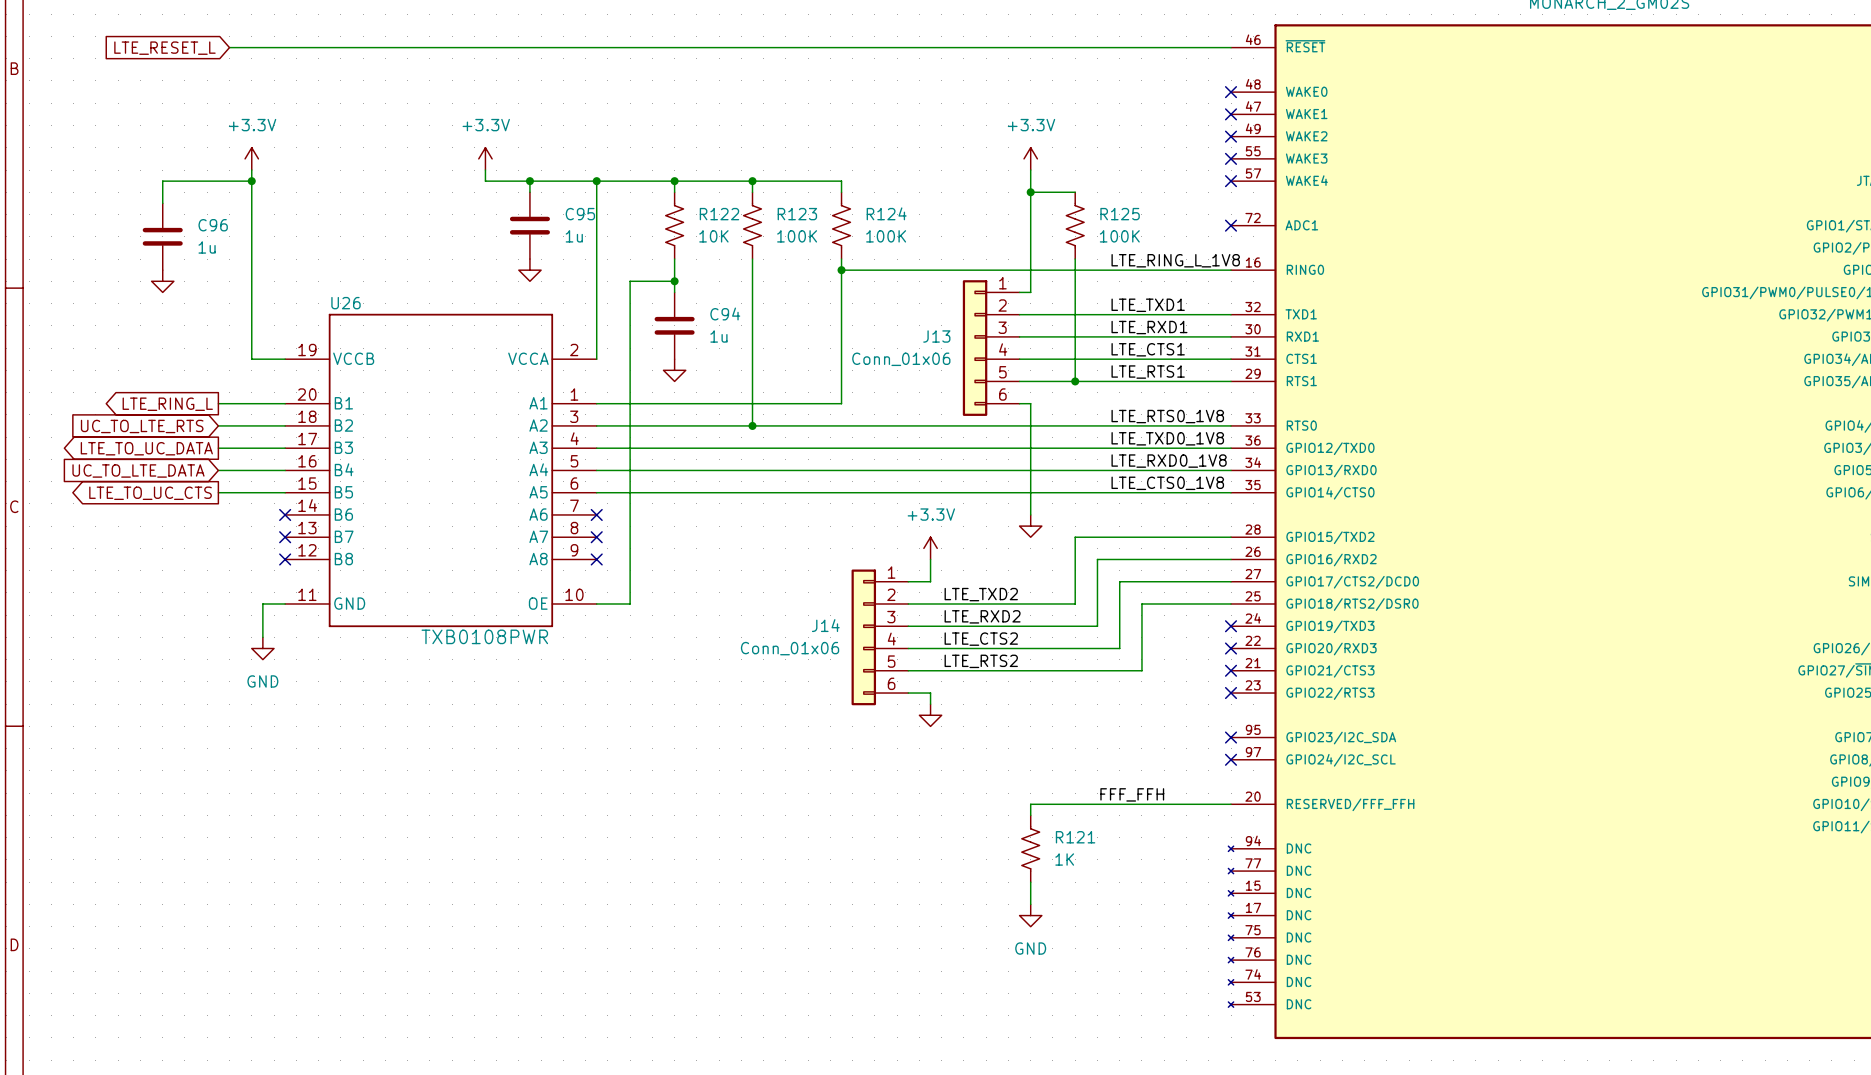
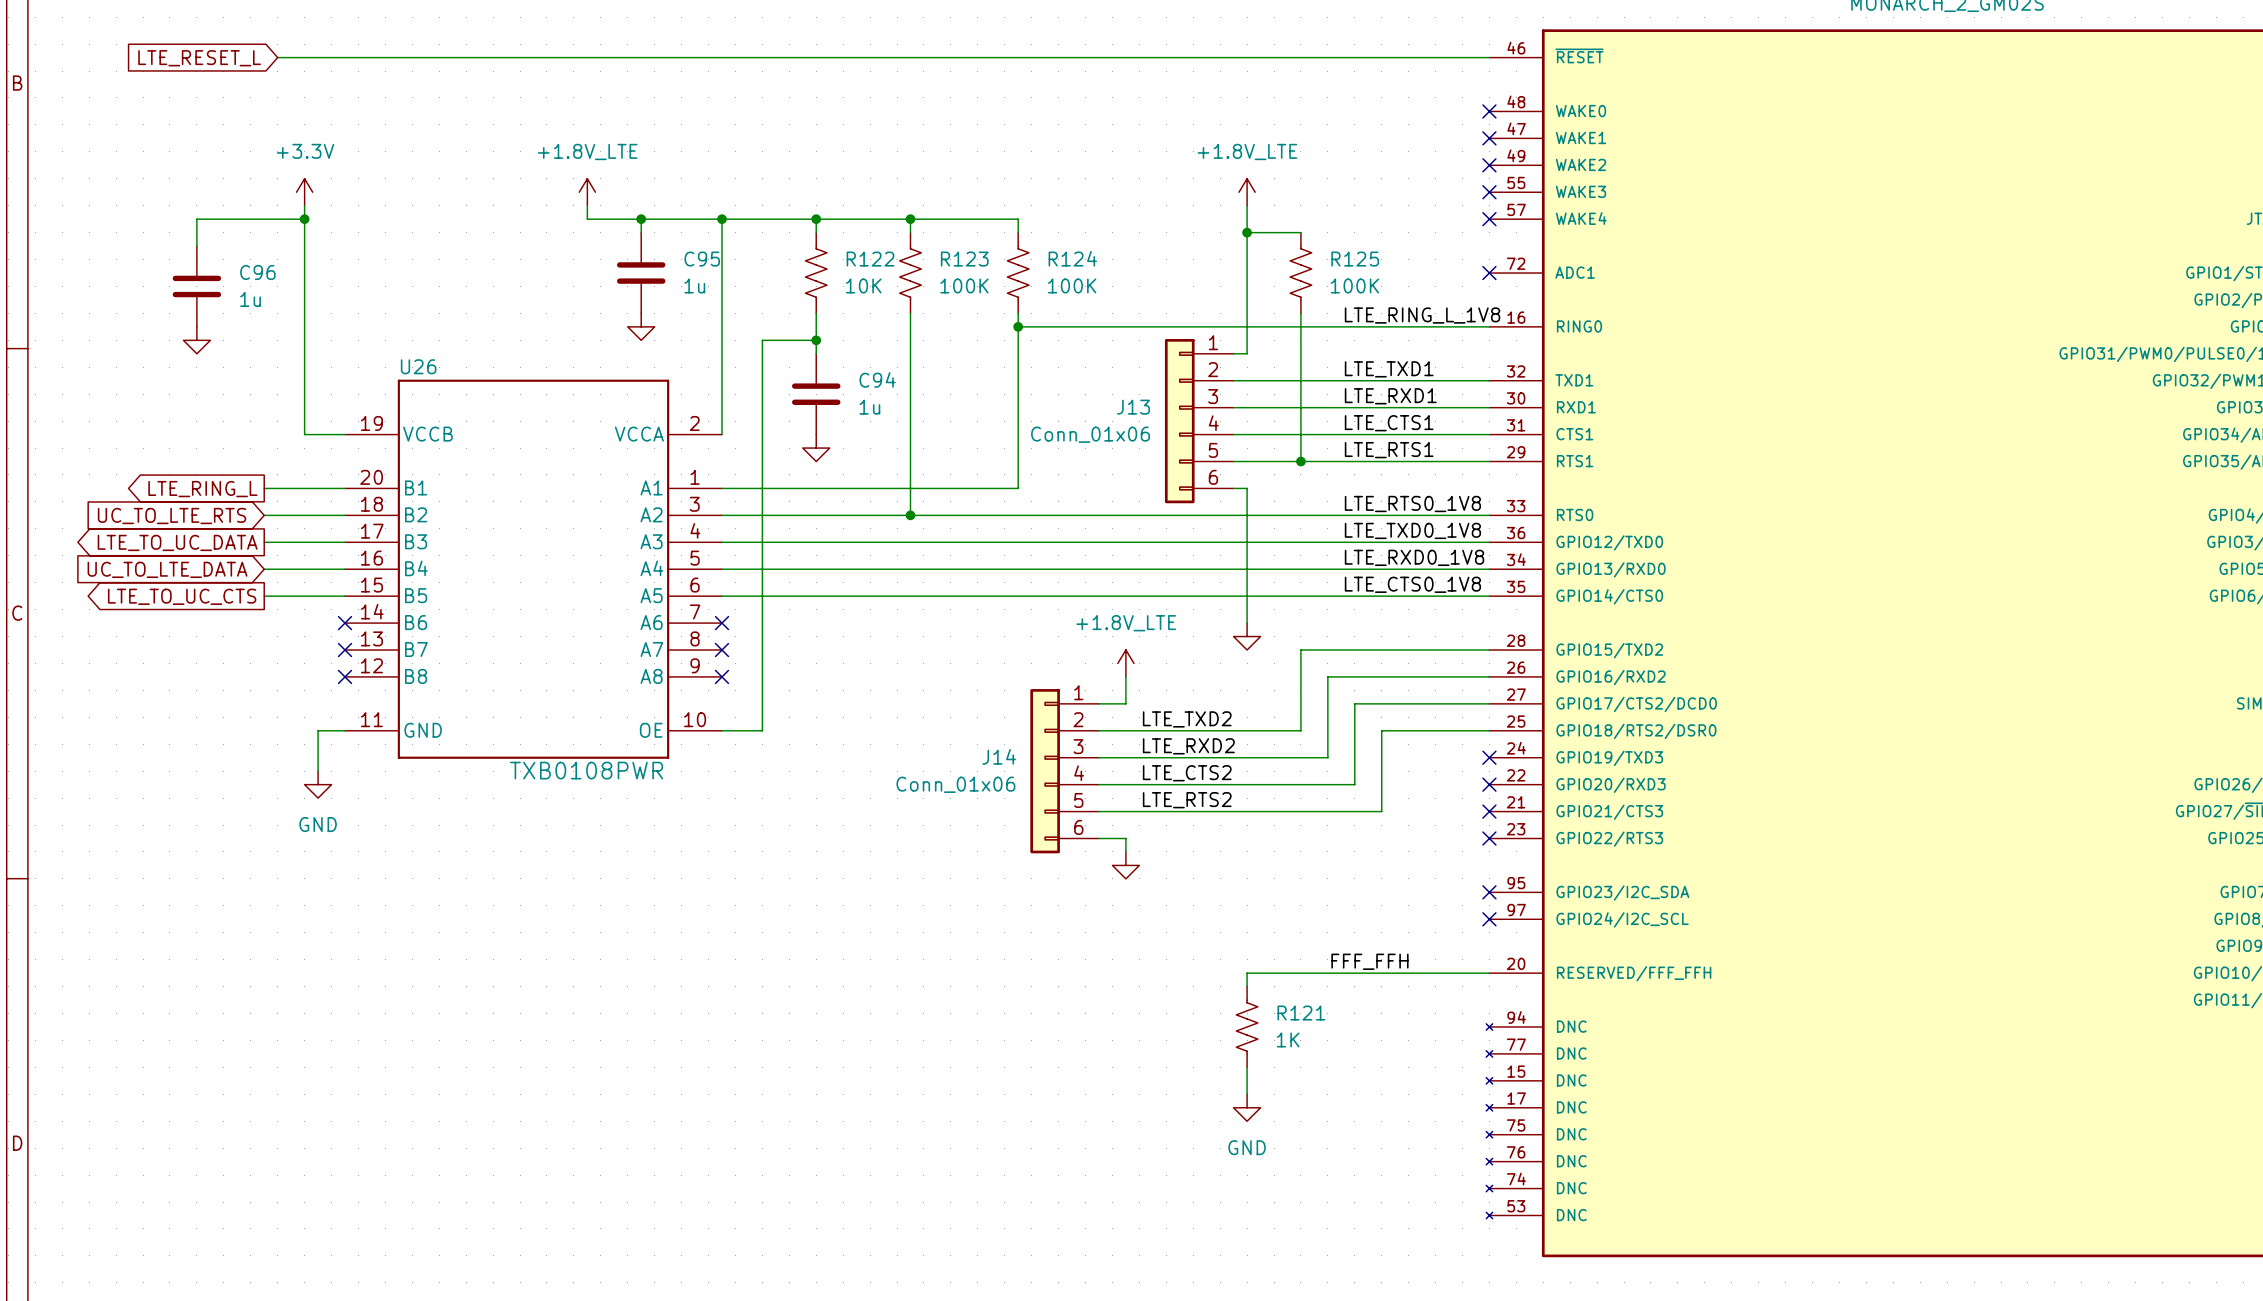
power symbol: +3.3V (485, 158) -> +1.8V_LTE (587, 192)
power symbol: +3.3V (1030, 158) -> +1.8V_LTE (1247, 192)
power symbol: +3.3V (930, 548) -> +1.8V_LTE (1125, 663)

